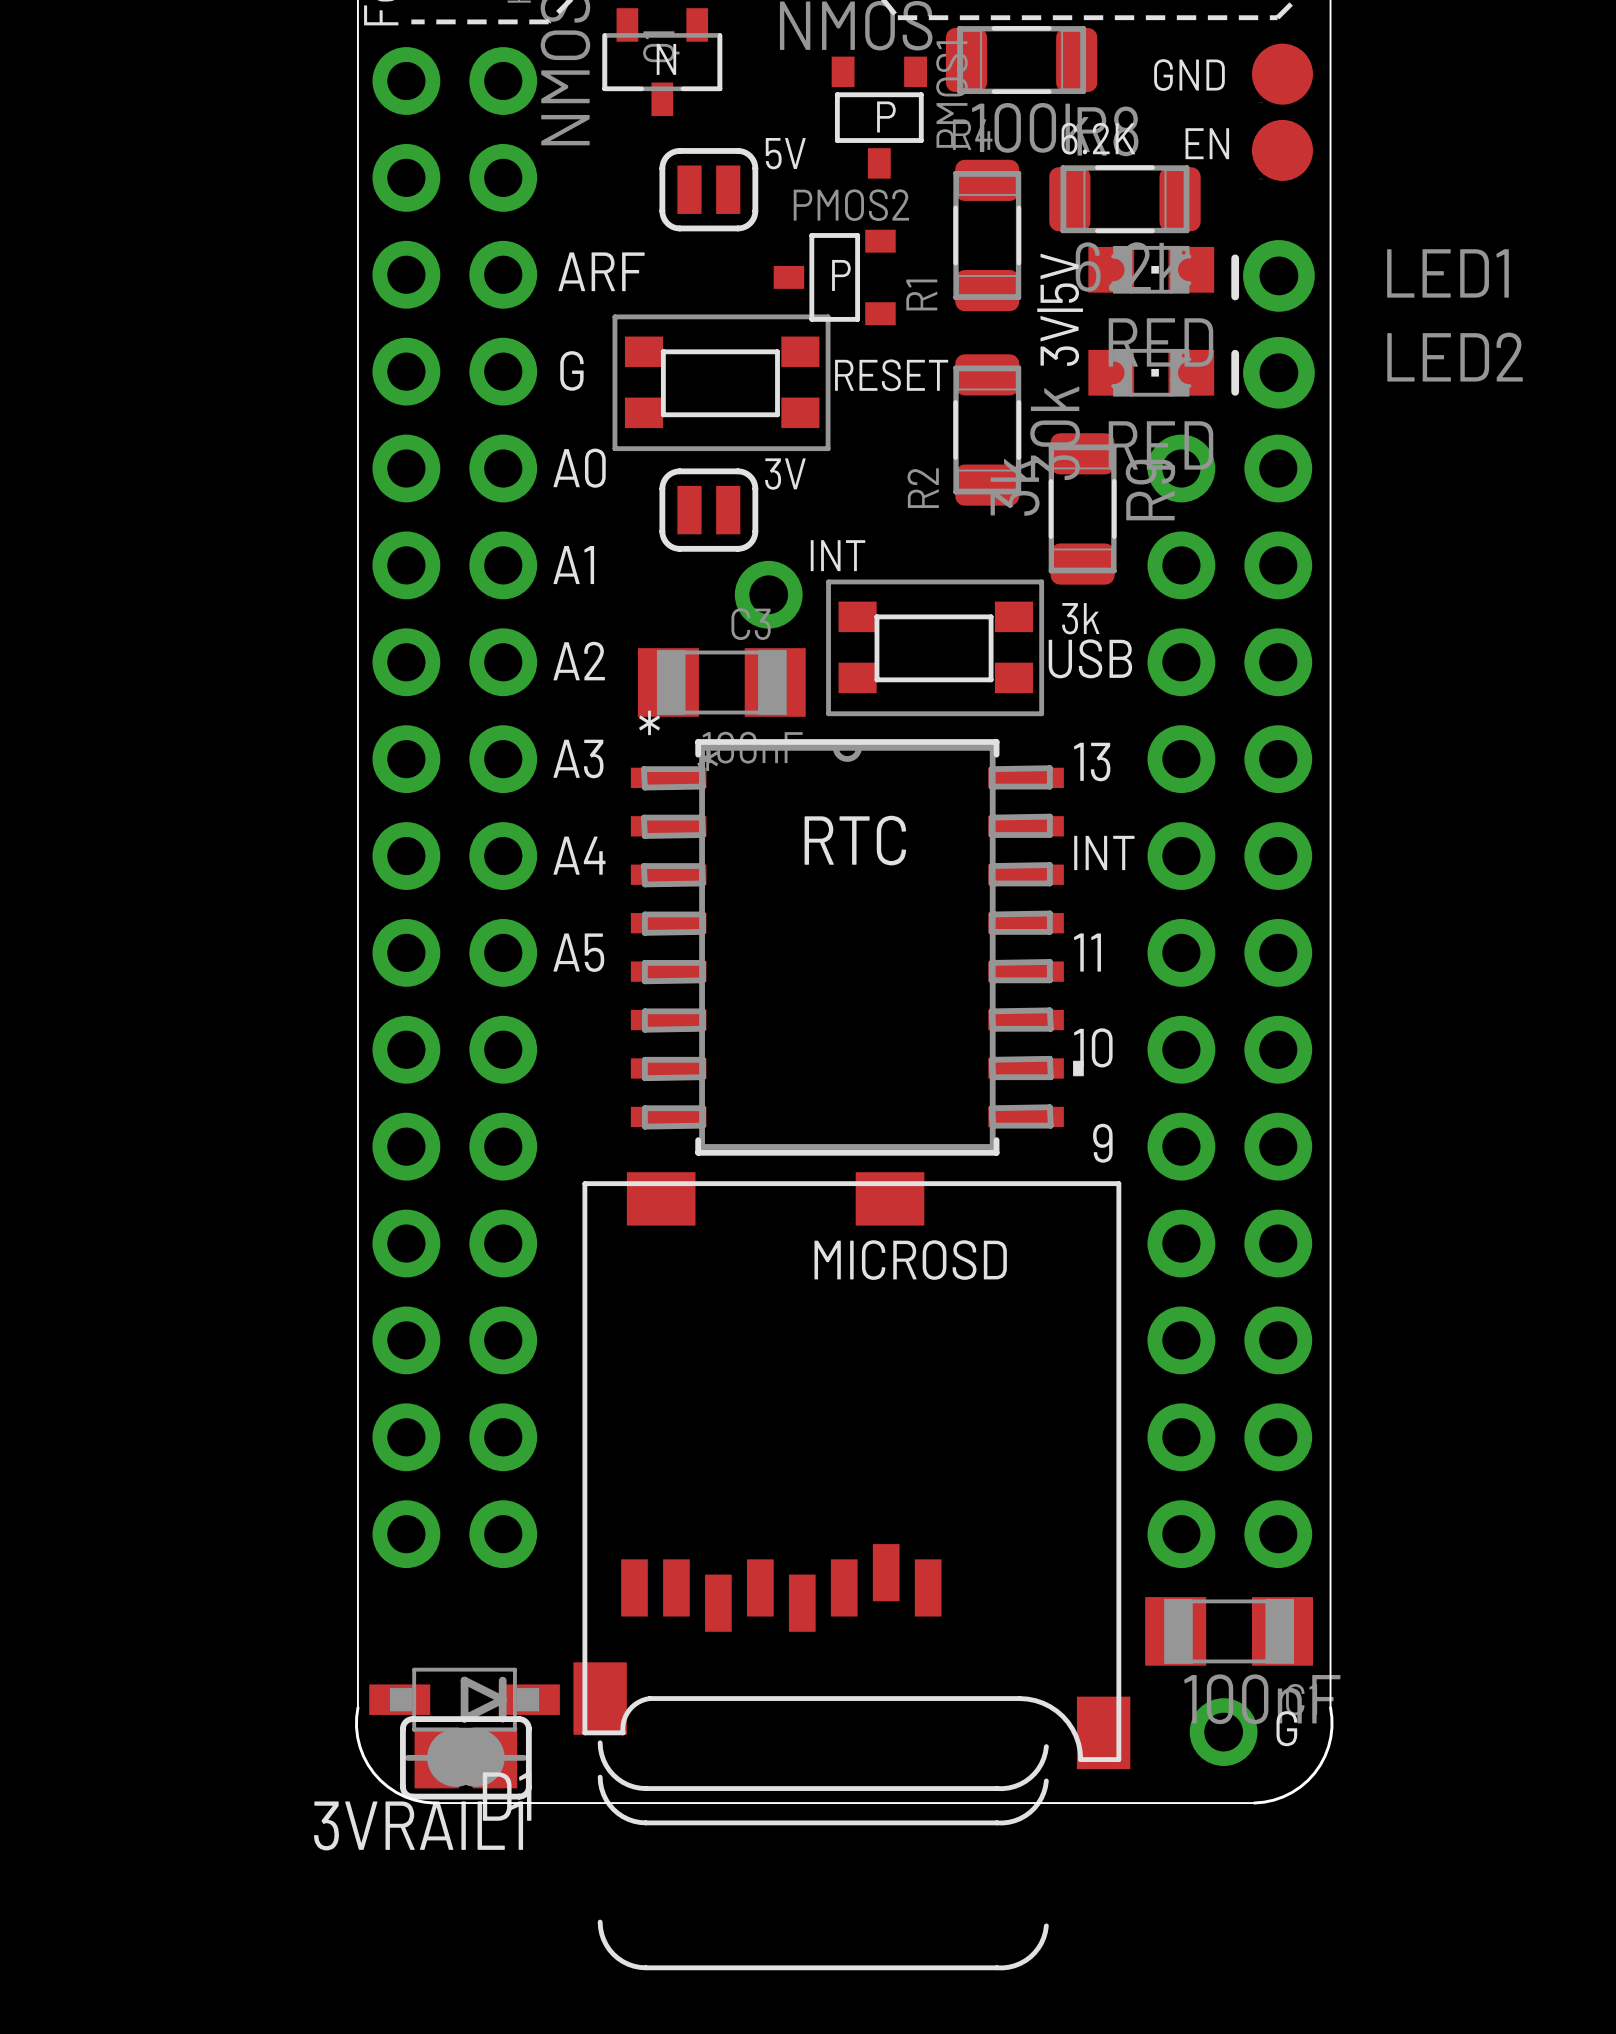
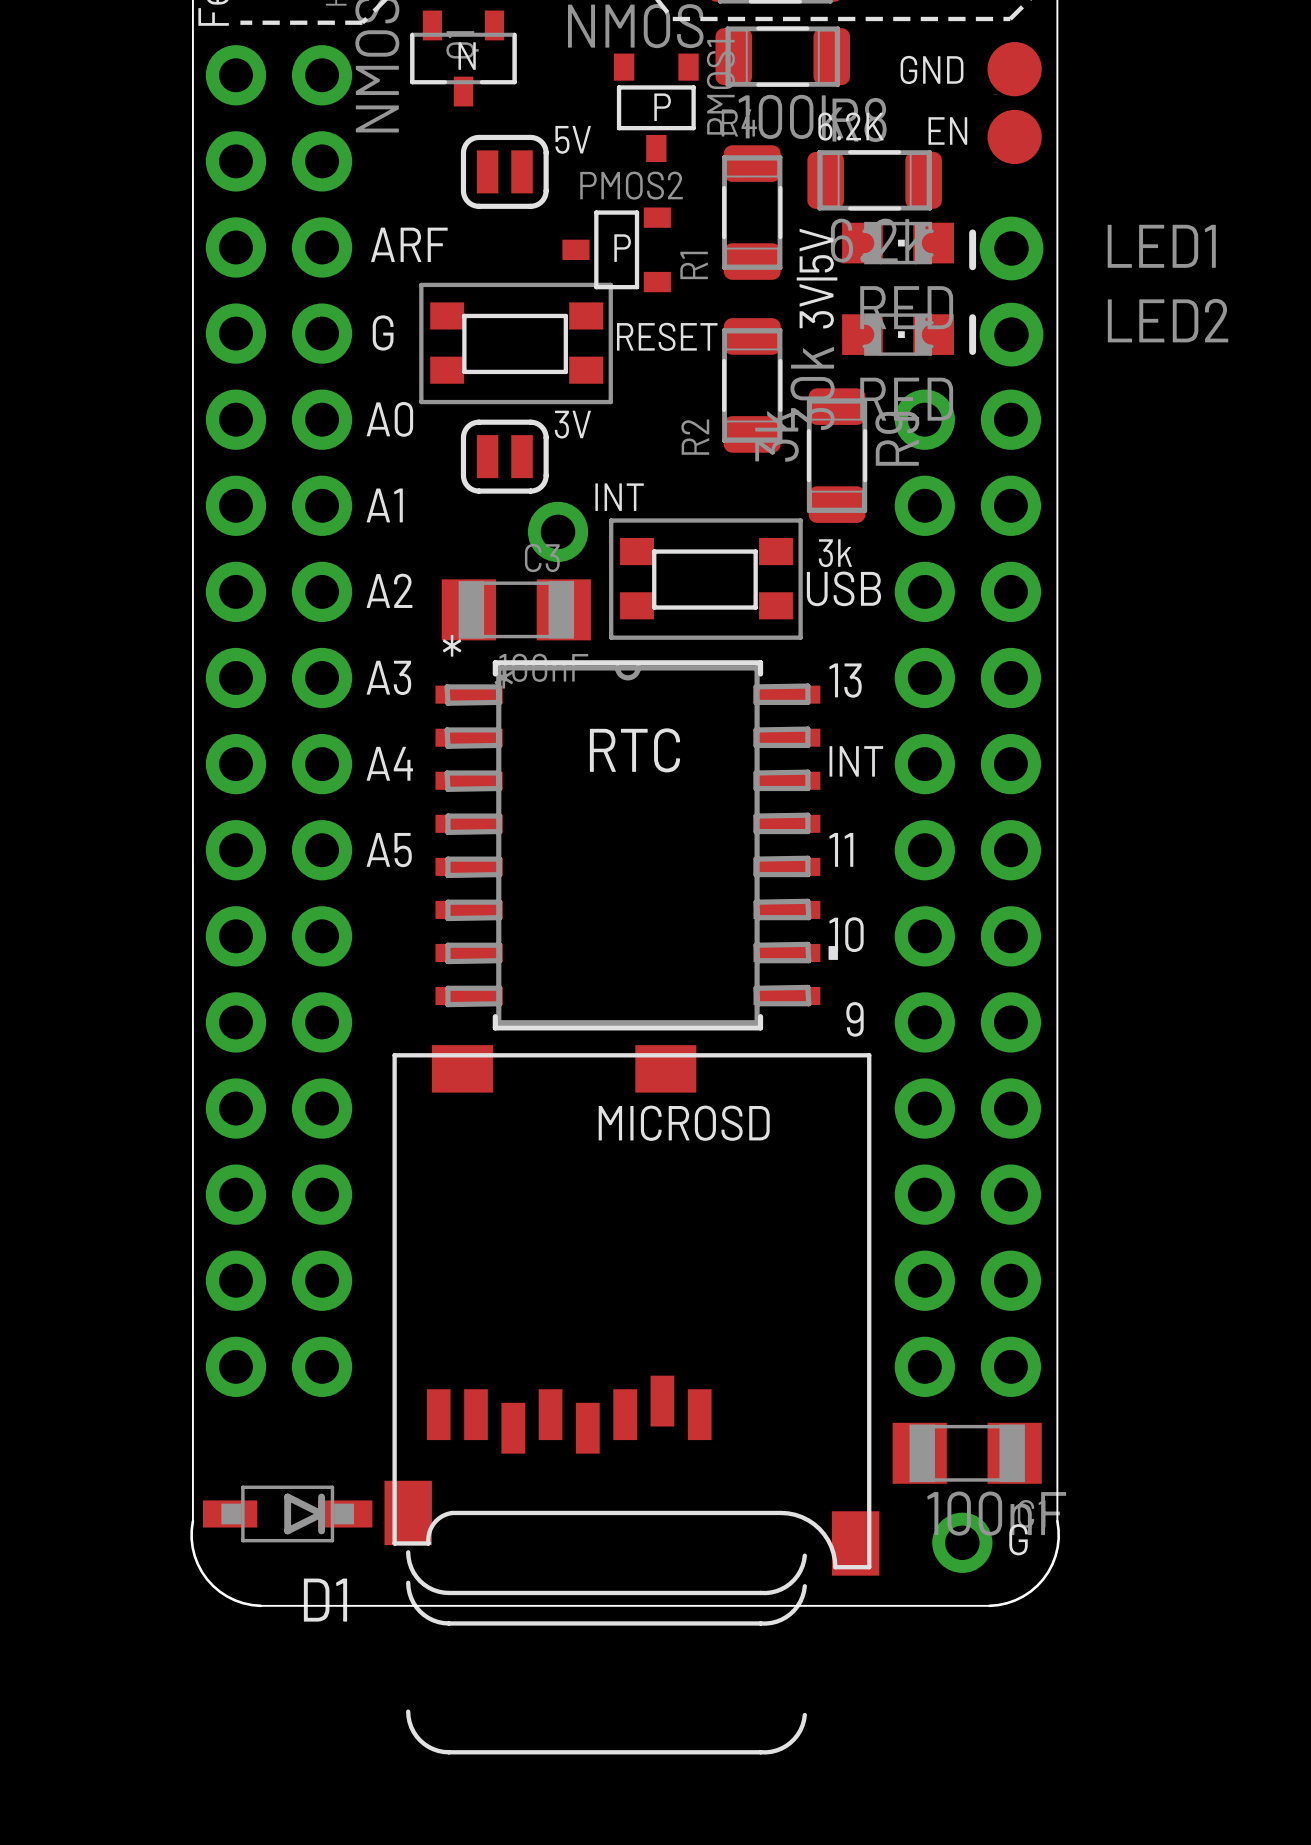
3VRAIL1: (465, 1757) -> none

